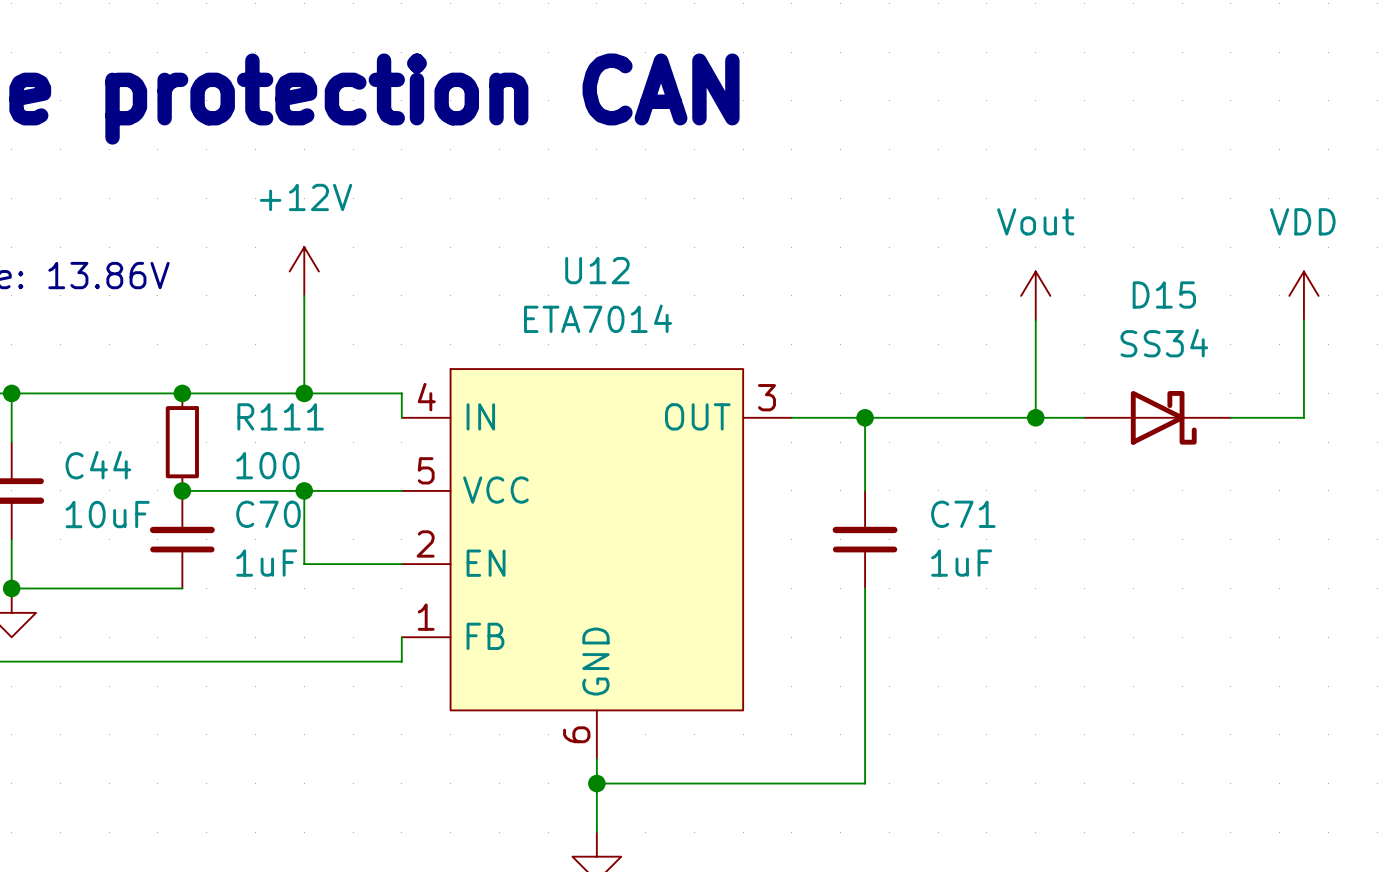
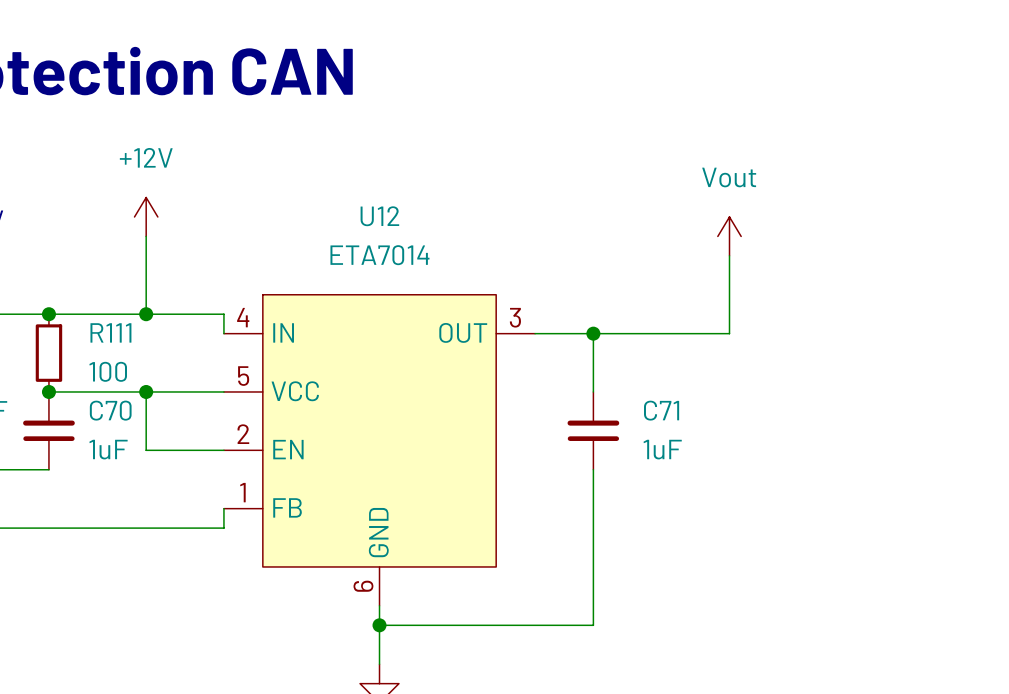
power symbol: VDD (1303, 295) -> none
wire: (1303, 320) (1303, 417) (1230, 417) -> none
wire: (1035, 417) (1084, 417) -> none
junction: (1035, 417) -> none
D15: SS34 (1157, 417) -> none

